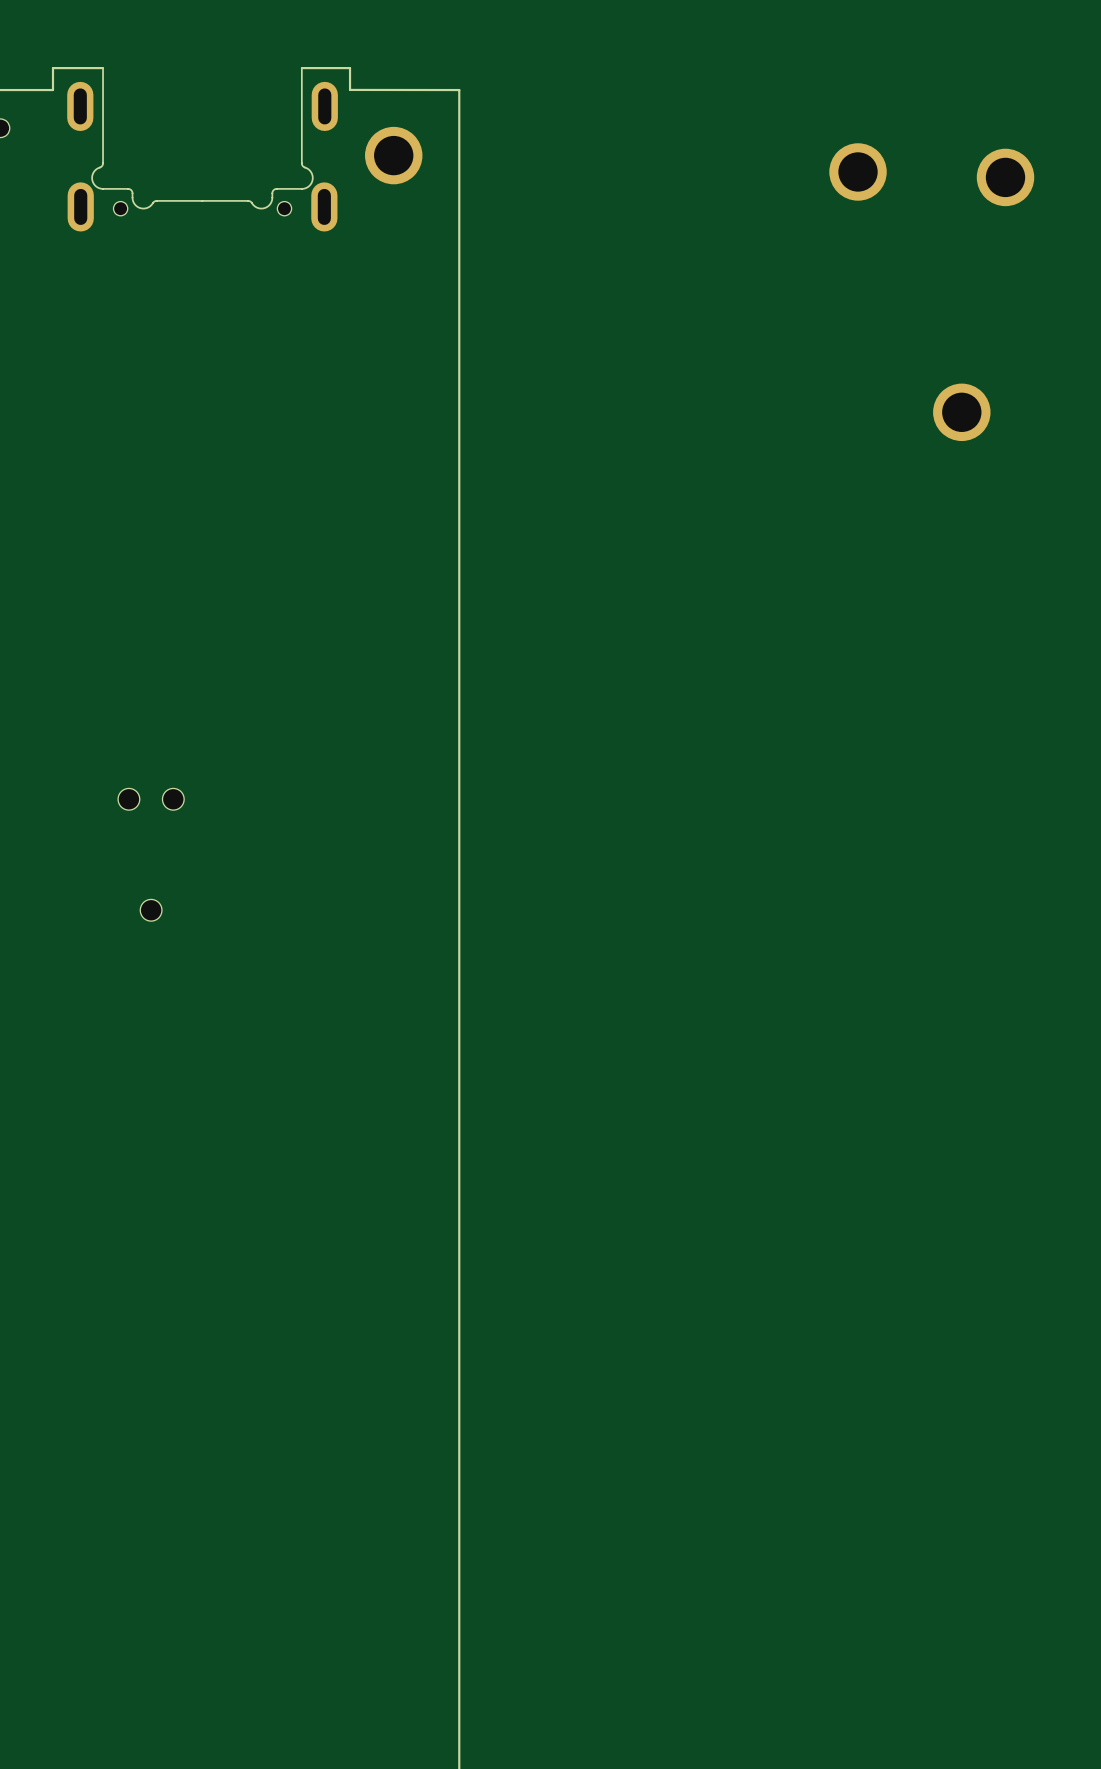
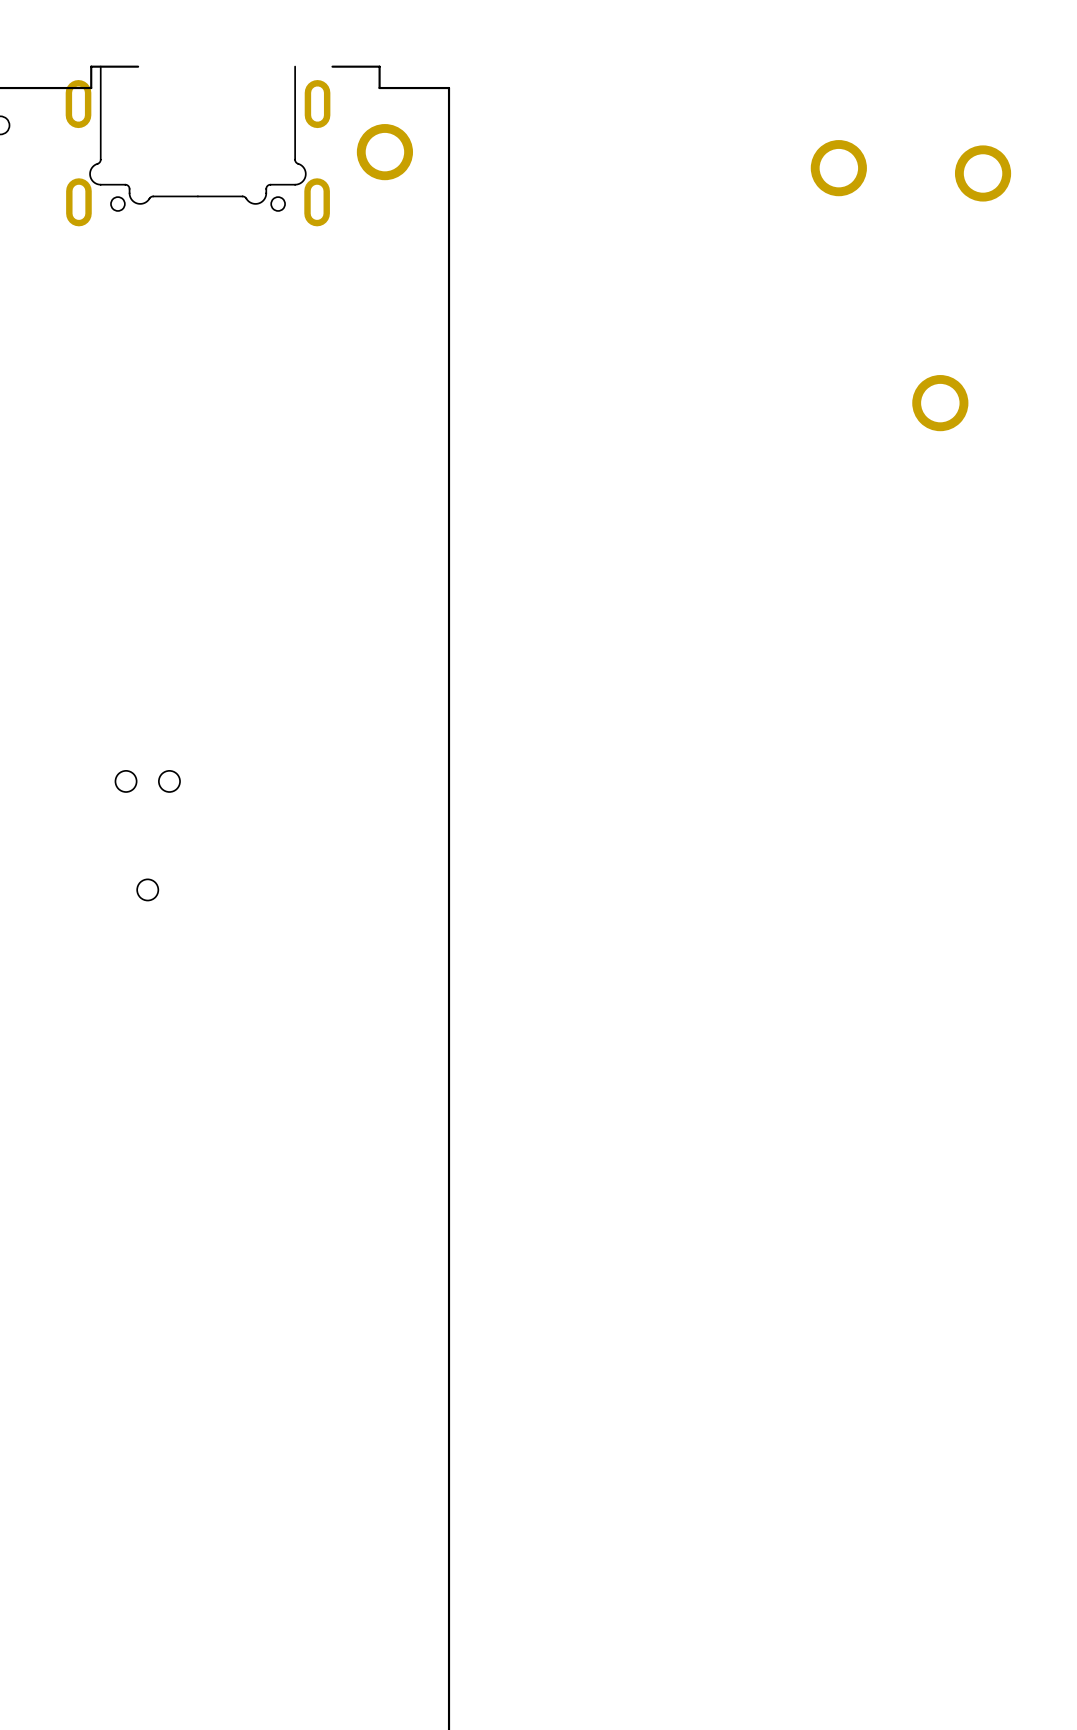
board edge: (103, 68) (52, 68) (52, 89) -> (138, 66) (91, 66) (91, 88) (51, 88)
board edge: (301, 68) (350, 68) (350, 89) (459, 90) -> (332, 66) (379, 66) (379, 88) (449, 88)

